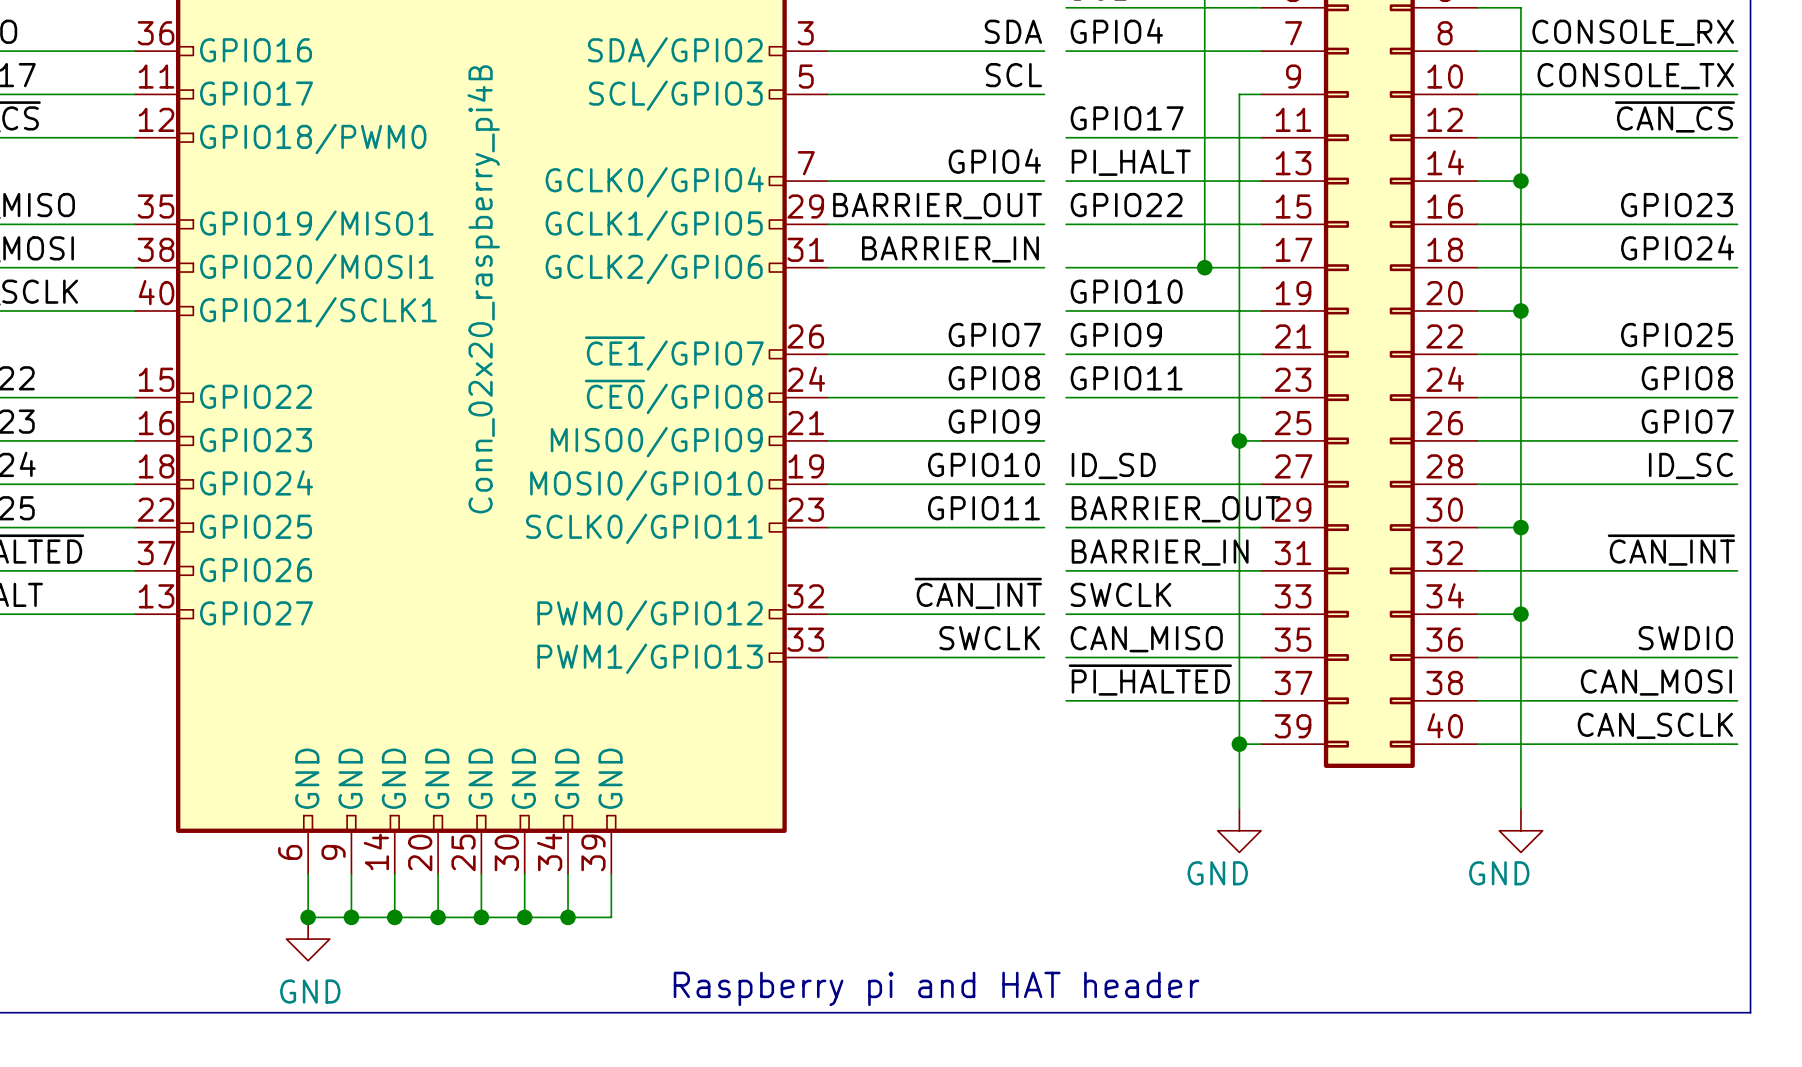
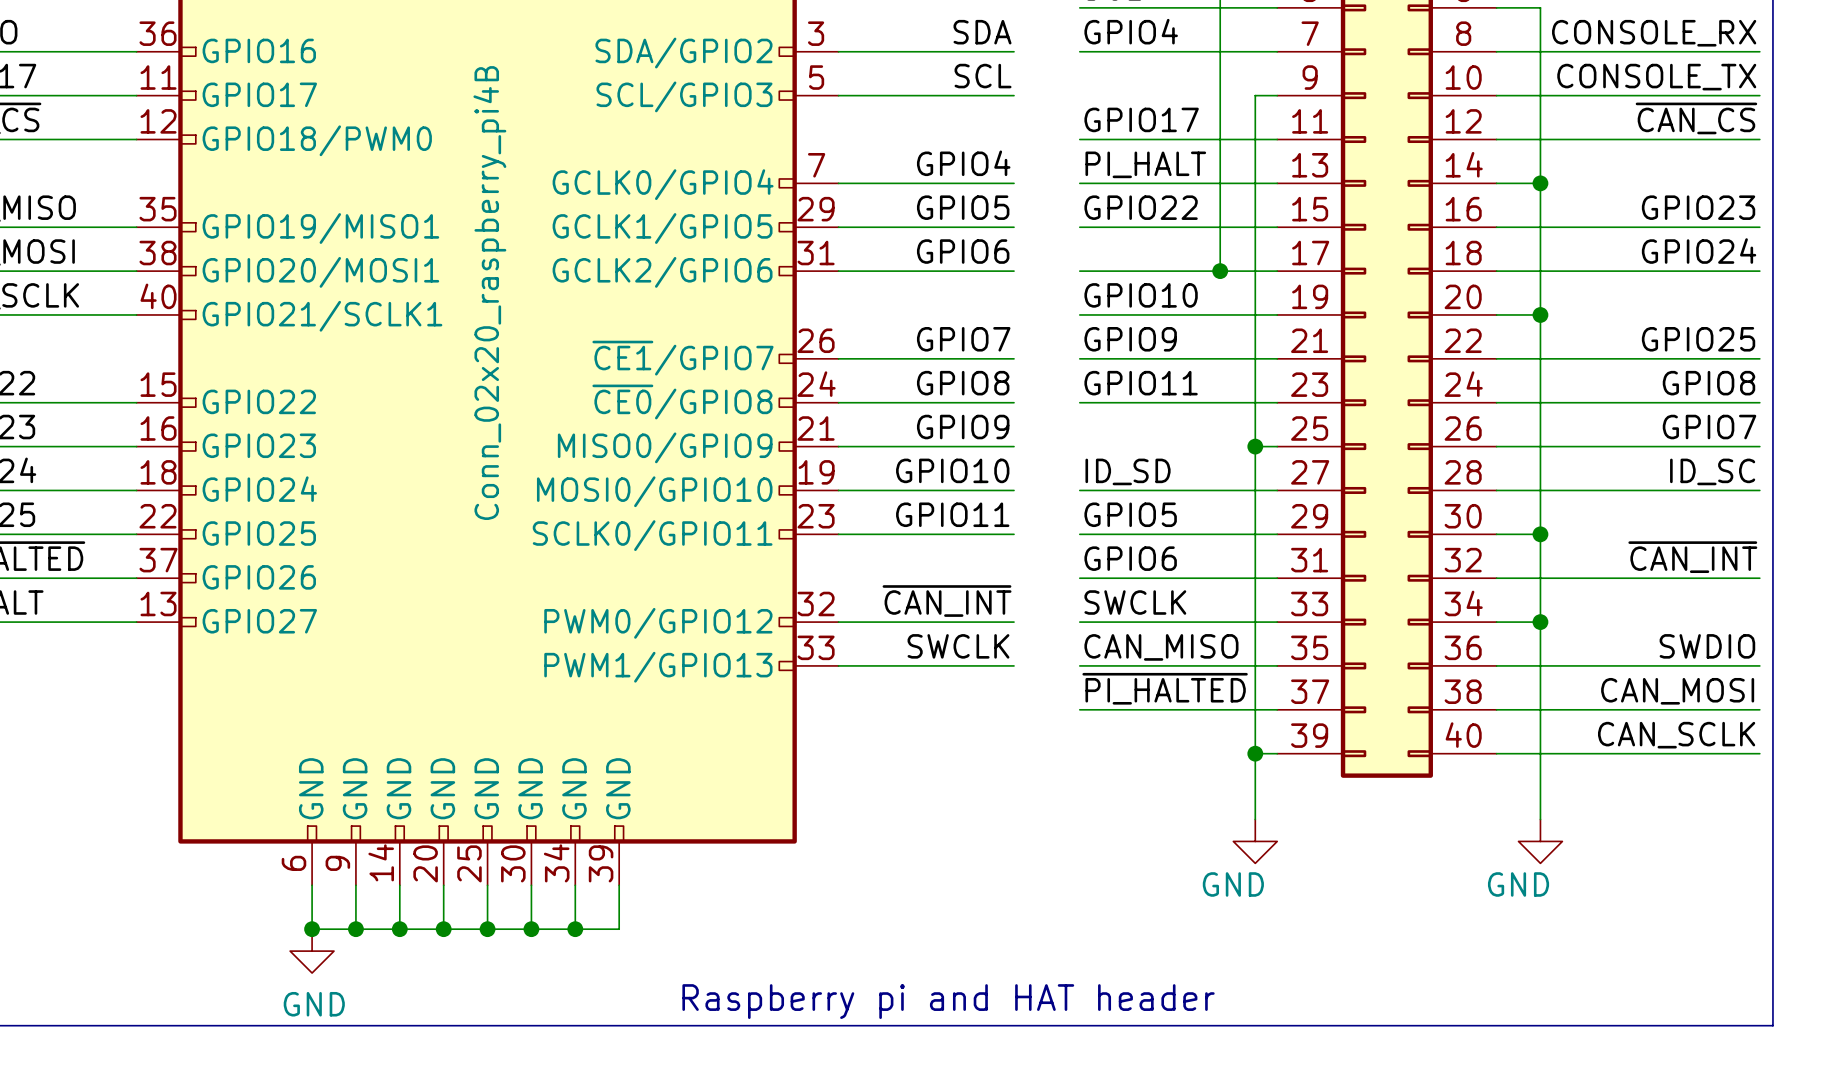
label position: SDA (1013, 31) -> SDA (982, 32)
wire: (1001, 51) (1044, 51) -> none
label position: SCL (1013, 75) -> SCL (983, 76)
wire: (1001, 94) (1044, 94) -> none
label position: GPIO4 (994, 161) -> GPIO4 (963, 163)
wire: (1001, 181) (1044, 181) -> none
label: none -> GPIO5 (963, 207)
label: BARRIER_OUT (937, 206) -> none
wire: (1001, 224) (1044, 224) -> none
label: none -> GPIO6 (963, 251)
label: BARRIER_IN (950, 249) -> none
wire: (1001, 267) (1044, 267) -> none
label position: GPIO7 (994, 334) -> GPIO7 (963, 339)
wire: (1001, 354) (1044, 354) -> none
label position: GPIO8 (994, 378) -> GPIO8 (963, 383)
wire: (1001, 397) (1044, 397) -> none
label position: GPIO9 (994, 421) -> GPIO9 (963, 427)
wire: (1001, 440) (1044, 440) -> none
label position: GPIO10 (983, 464) -> GPIO10 (952, 470)
wire: (1001, 484) (1044, 484) -> none
label position: GPIO11 (983, 508) -> GPIO11 (952, 514)
label: BARRIER_OUT (1176, 509) -> GPIO5 (1130, 514)
wire: (1001, 527) (1044, 527) -> none
label: BARRIER_IN (1160, 552) -> GPIO6 (1130, 558)
label position: ~{CAN_INT} (978, 593) -> ~{CAN_INT} (947, 601)
wire: (1001, 614) (1044, 614) -> none
label position: SWCLK (989, 638) -> SWCLK (958, 646)
wire: (1001, 657) (1044, 657) -> none

